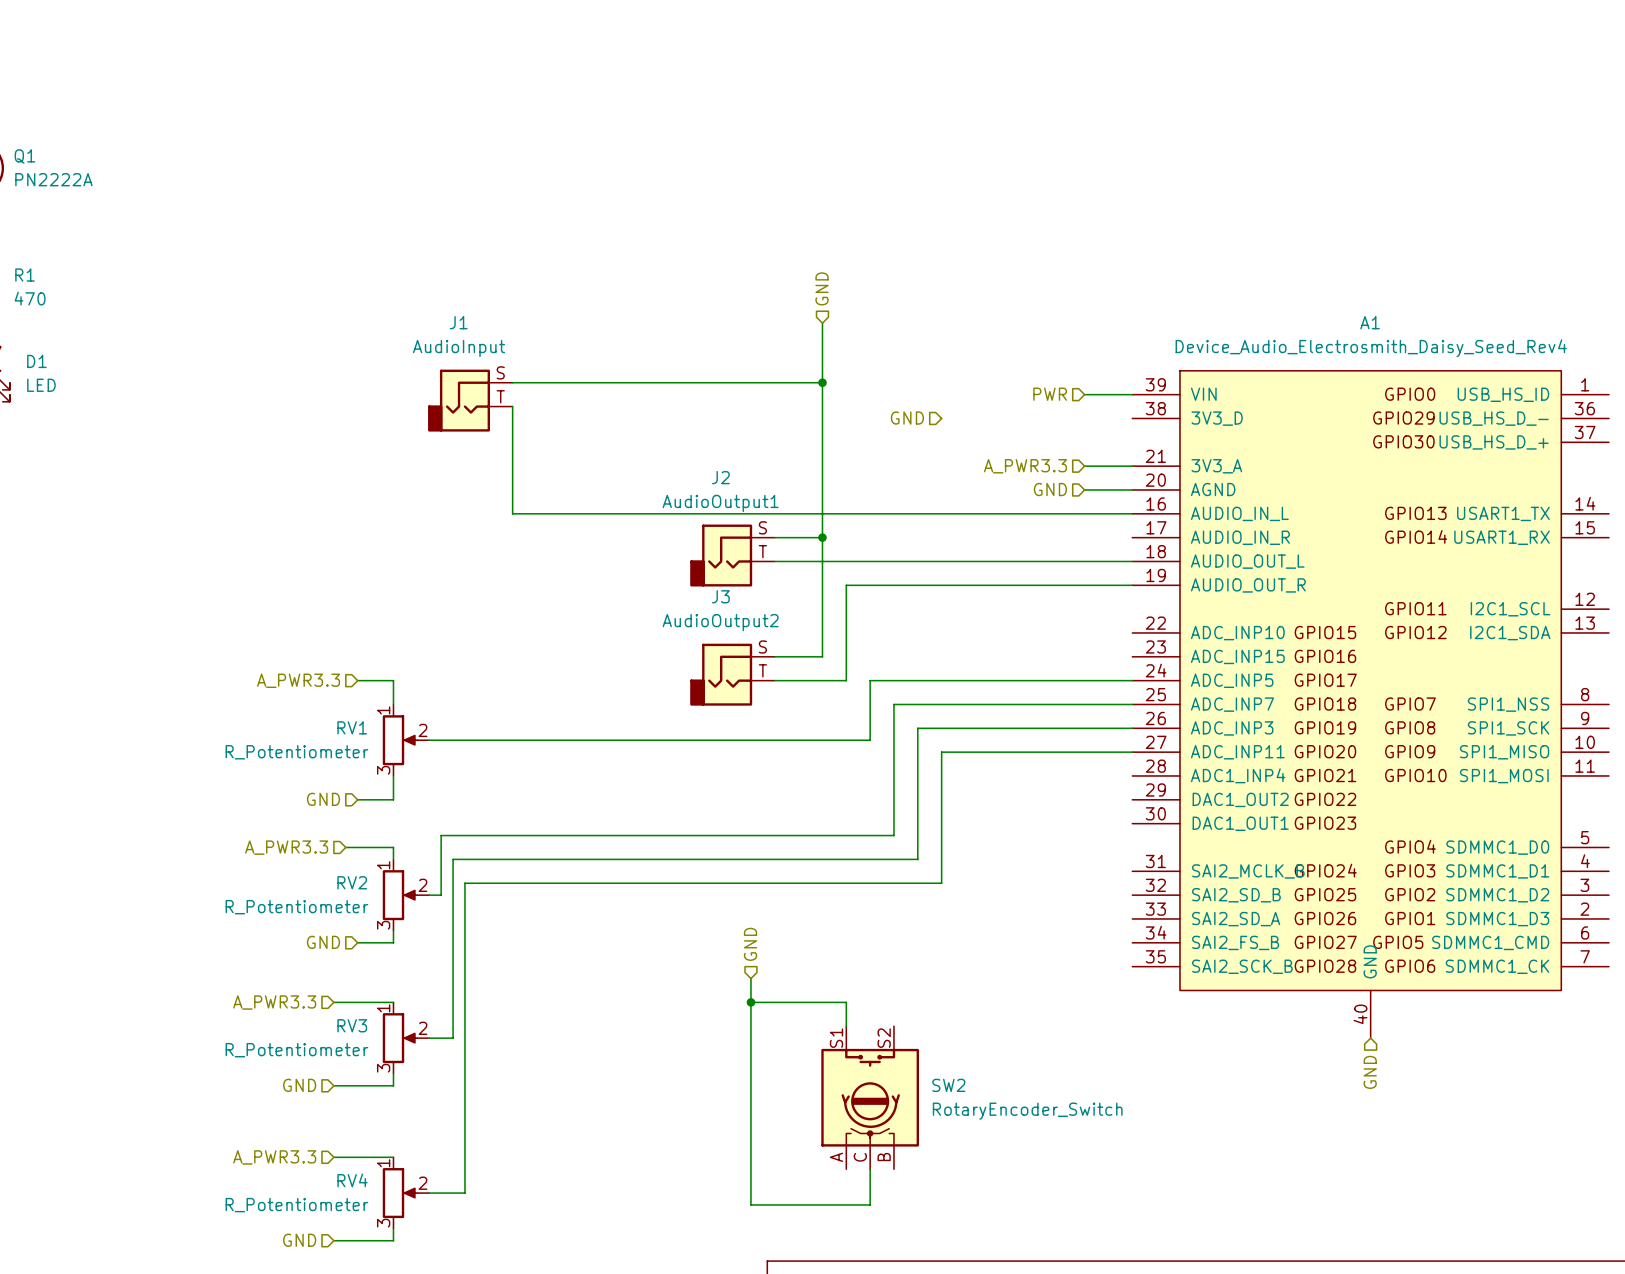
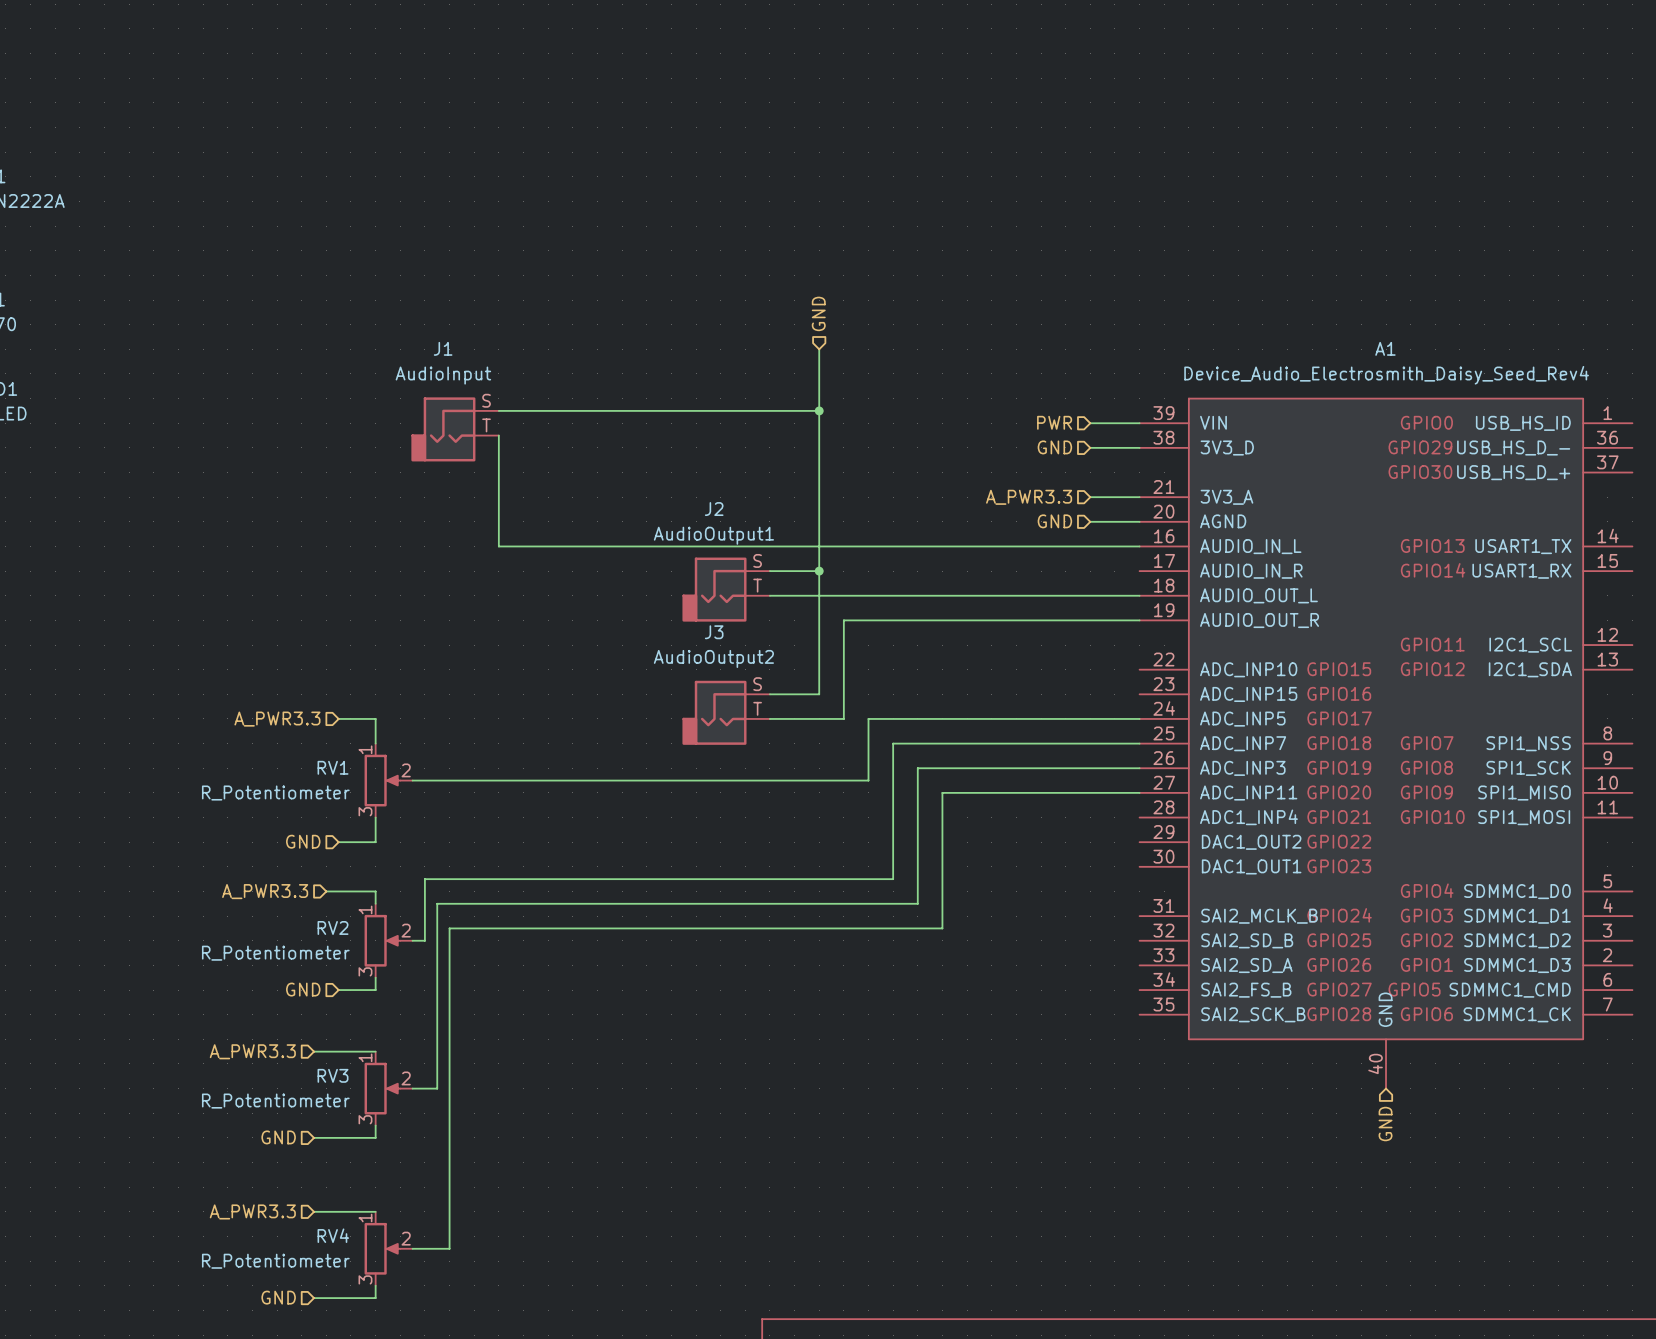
hierarchical label position: GND (907, 418) -> GND (1054, 447)
wire: none -> (1090, 447) (1139, 447)
hierarchical label: GND (750, 944) -> none
wire: (750, 978) (750, 1204) (870, 1204) (870, 1169) -> none
wire: (750, 1002) (846, 1002) (846, 1026) -> none
junction: (750, 1002) -> none
SW2: RotaryEncoder_Switch (870, 1097) -> none

